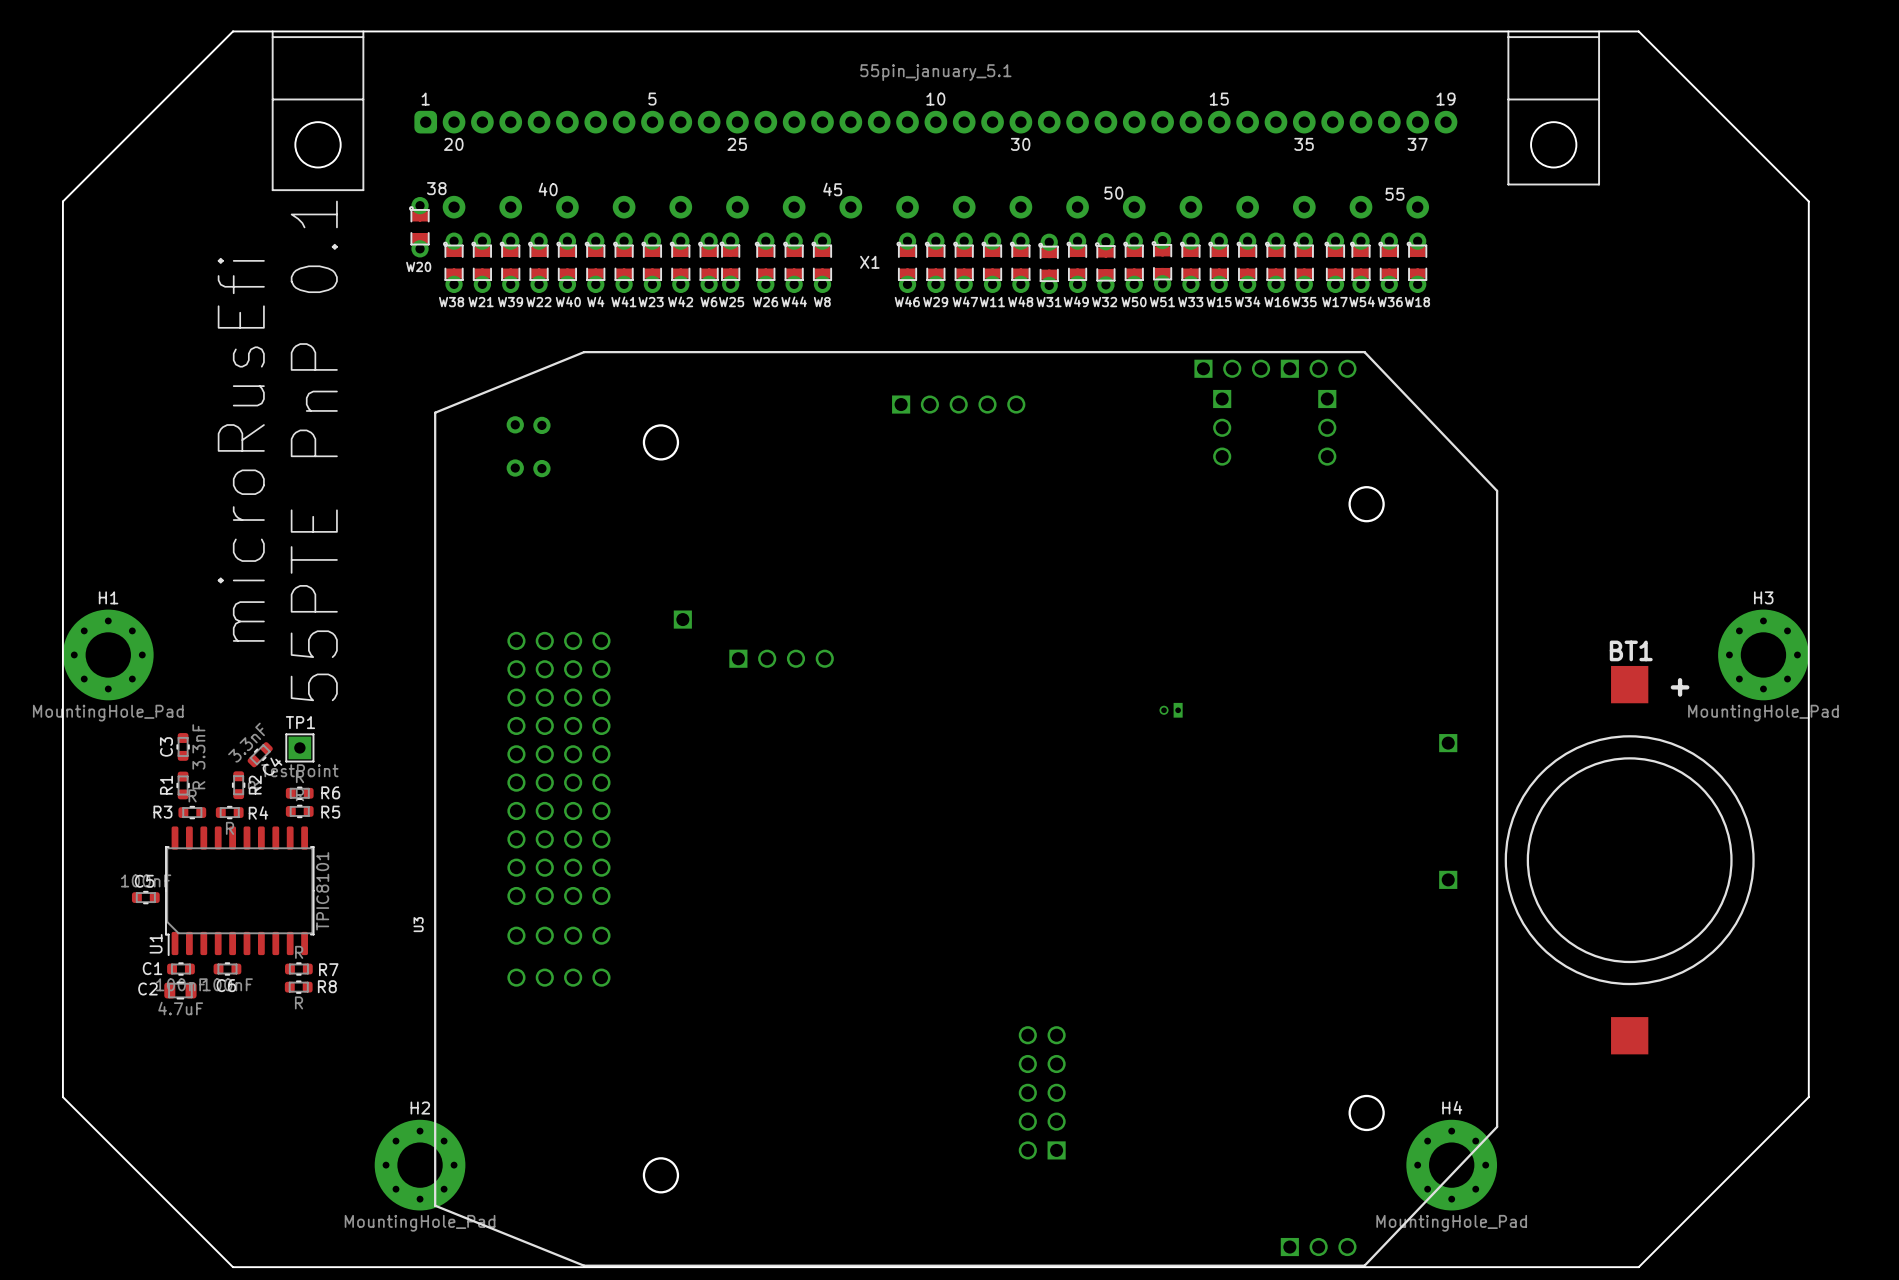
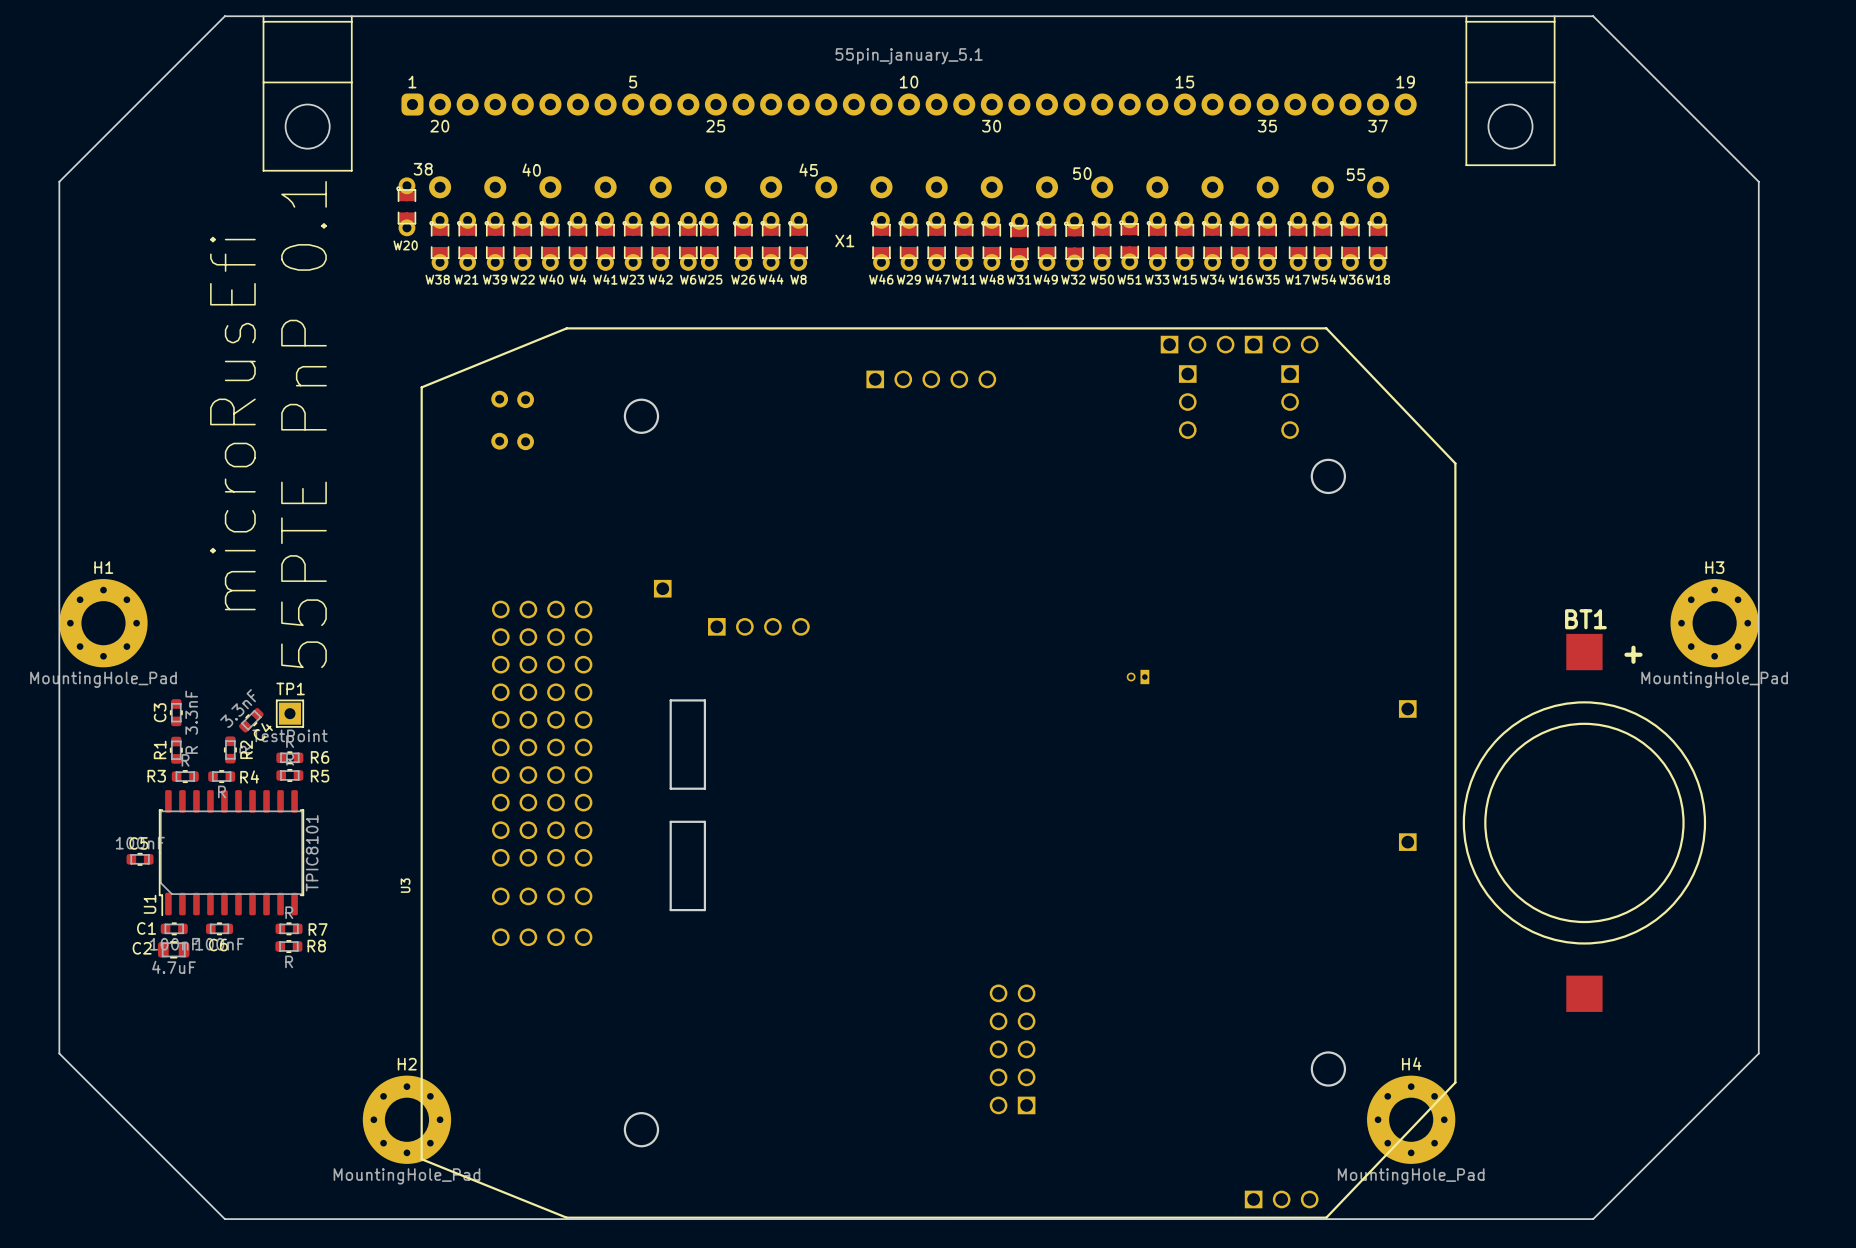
board edge: none -> (670, 700) (670, 788) (704, 788) (704, 700) (670, 700)
board edge: none -> (670, 821) (670, 910) (704, 910) (704, 821) (670, 821)

